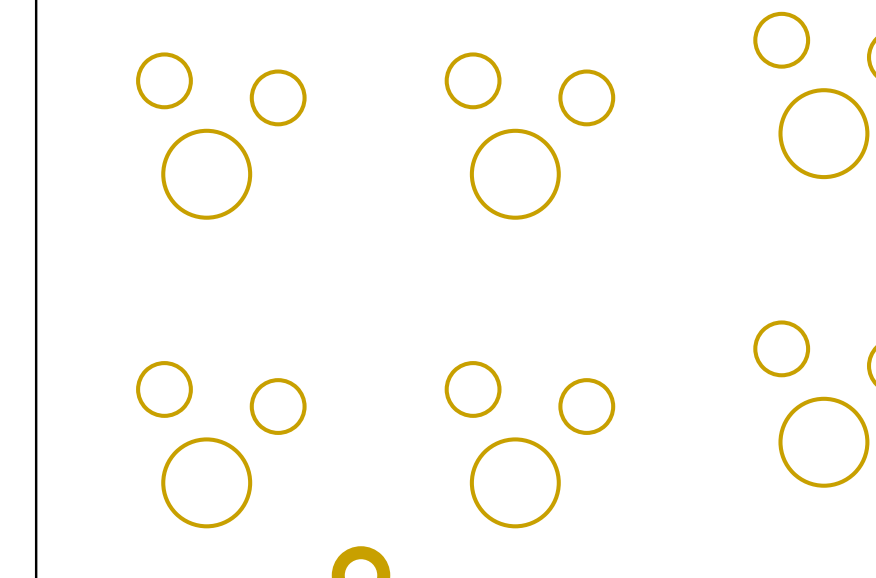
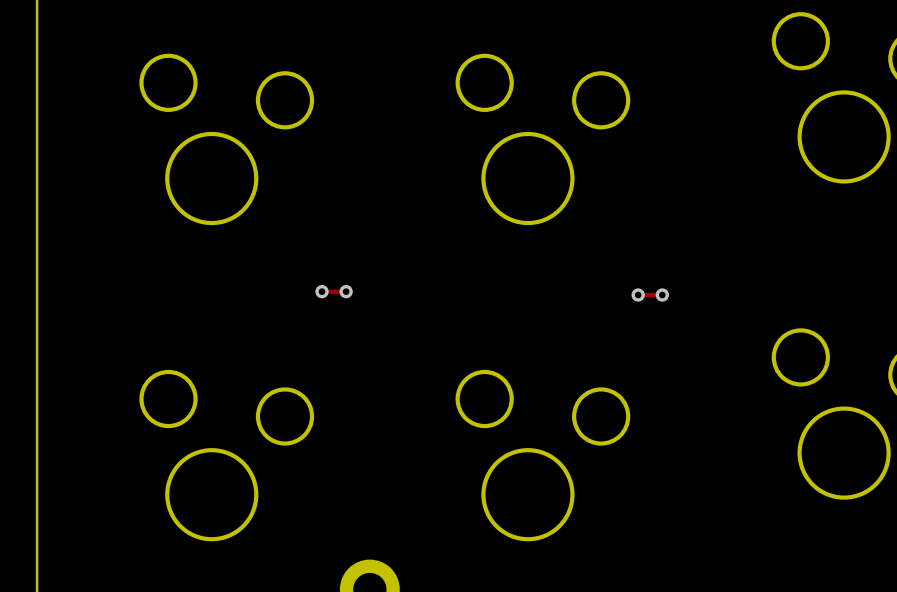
track: none -> (322, 291) (346, 291)
via: none -> (322, 291)
via: none -> (346, 291)
track: none -> (638, 295) (662, 295)
via: none -> (638, 295)
via: none -> (662, 295)

